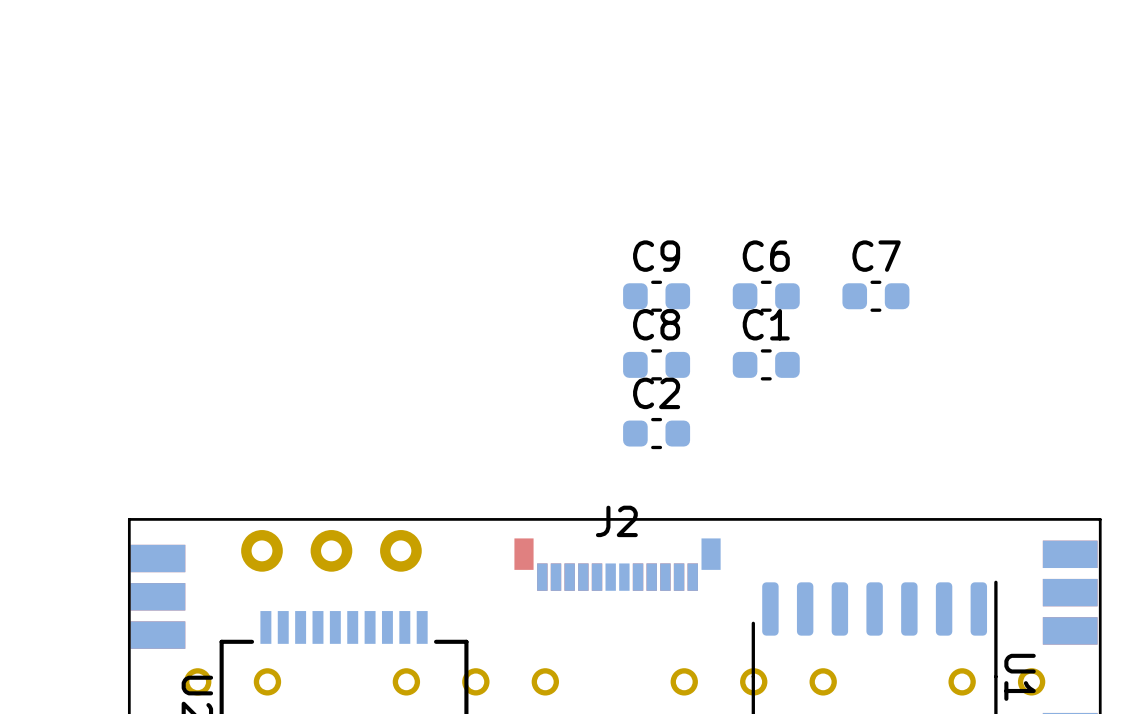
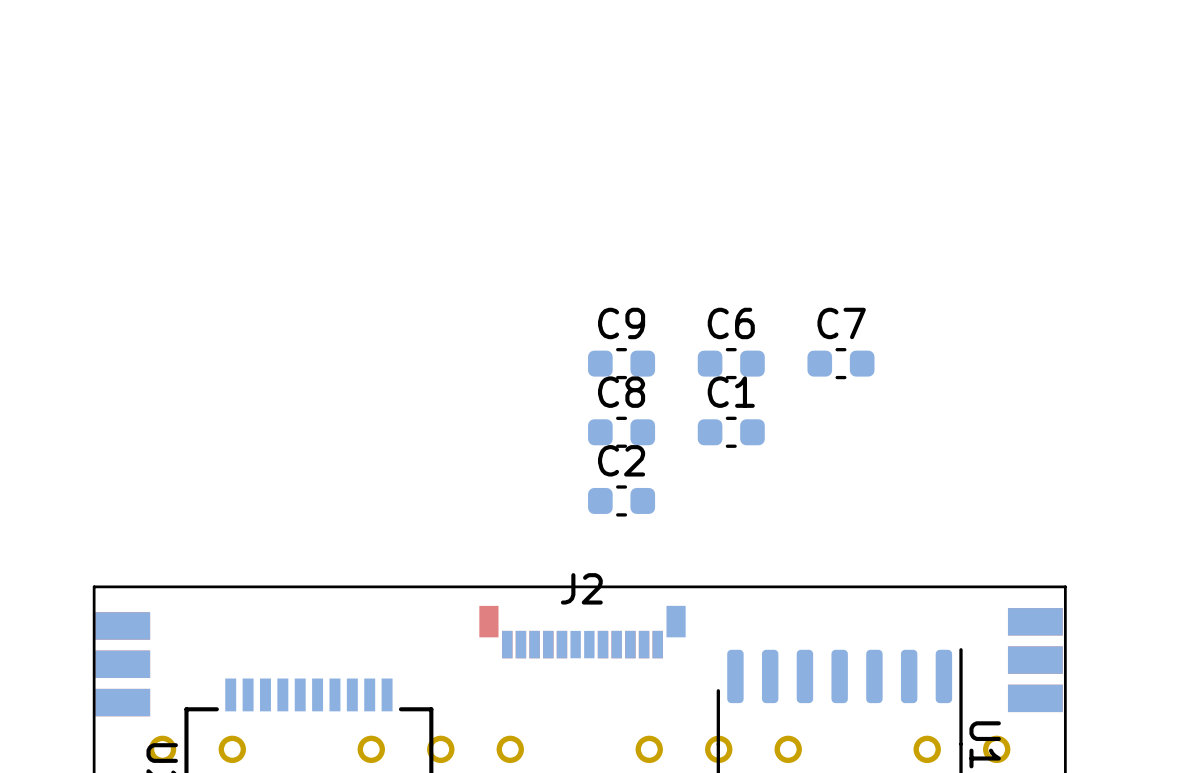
part: (331, 550) -> none

